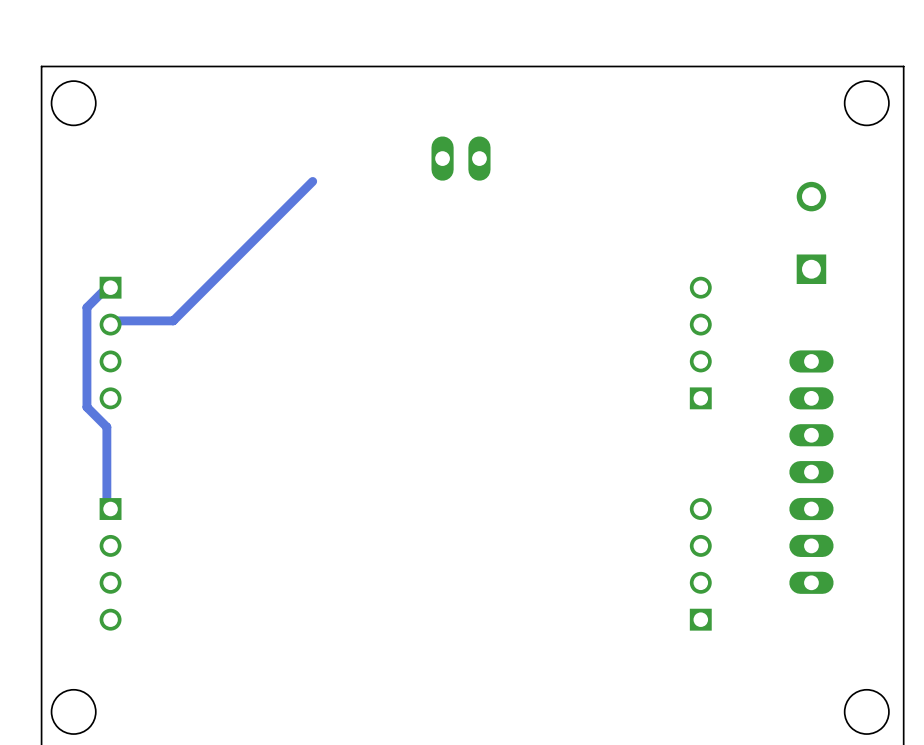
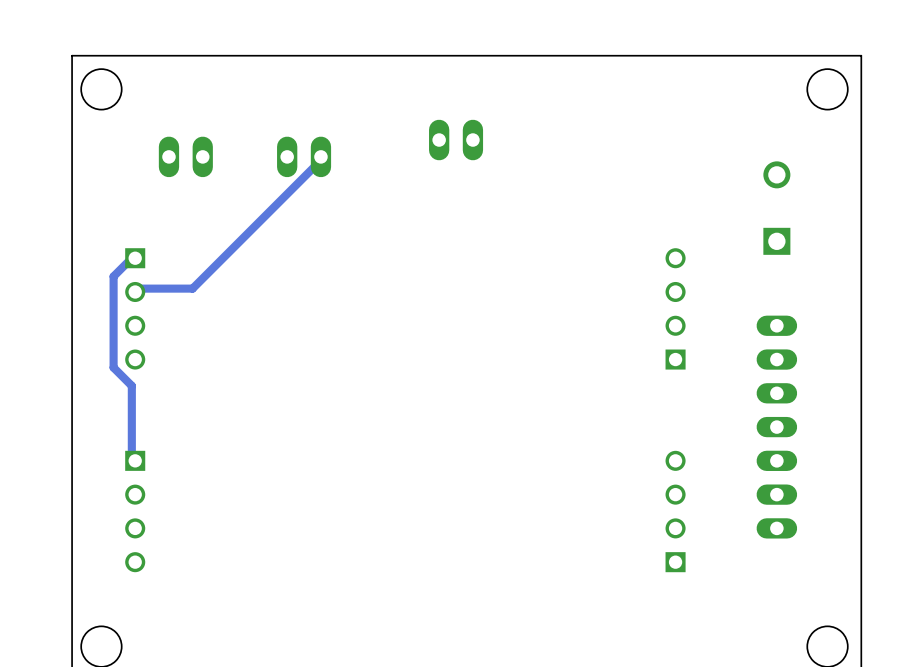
part: none -> (185, 156)
part: none -> (304, 156)

